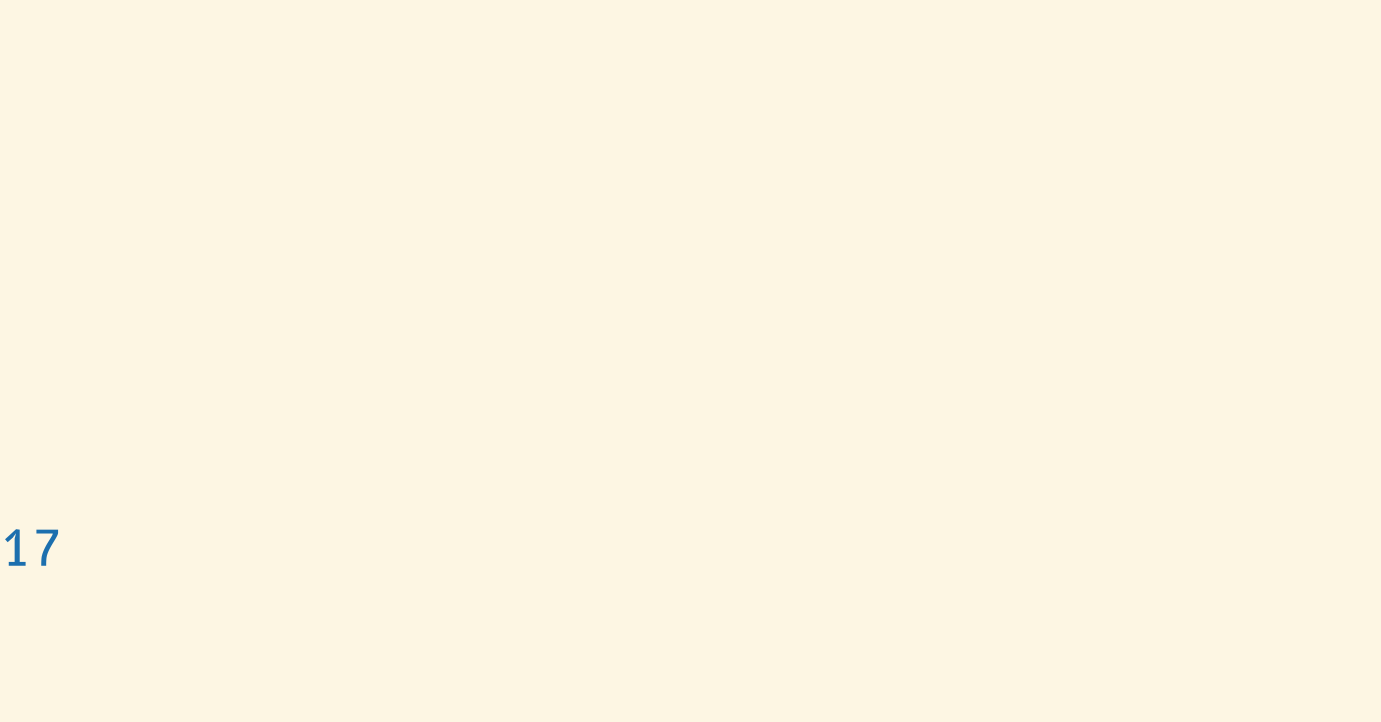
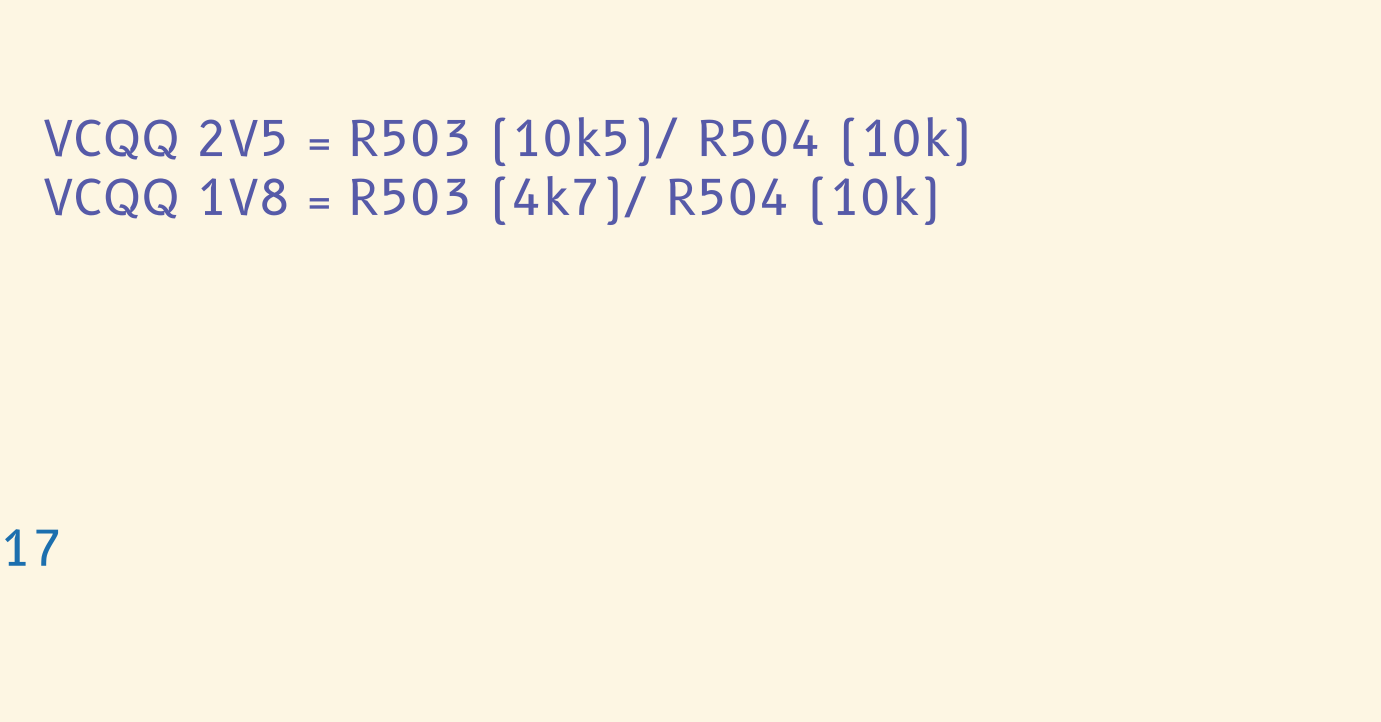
text: none -> VCQQ 2V5 = R503 (10k5)/ R504 (10k) (505, 141)
text: none -> VCQQ 1V8 = R503 (4k7)/ R504 (10k) (489, 200)

